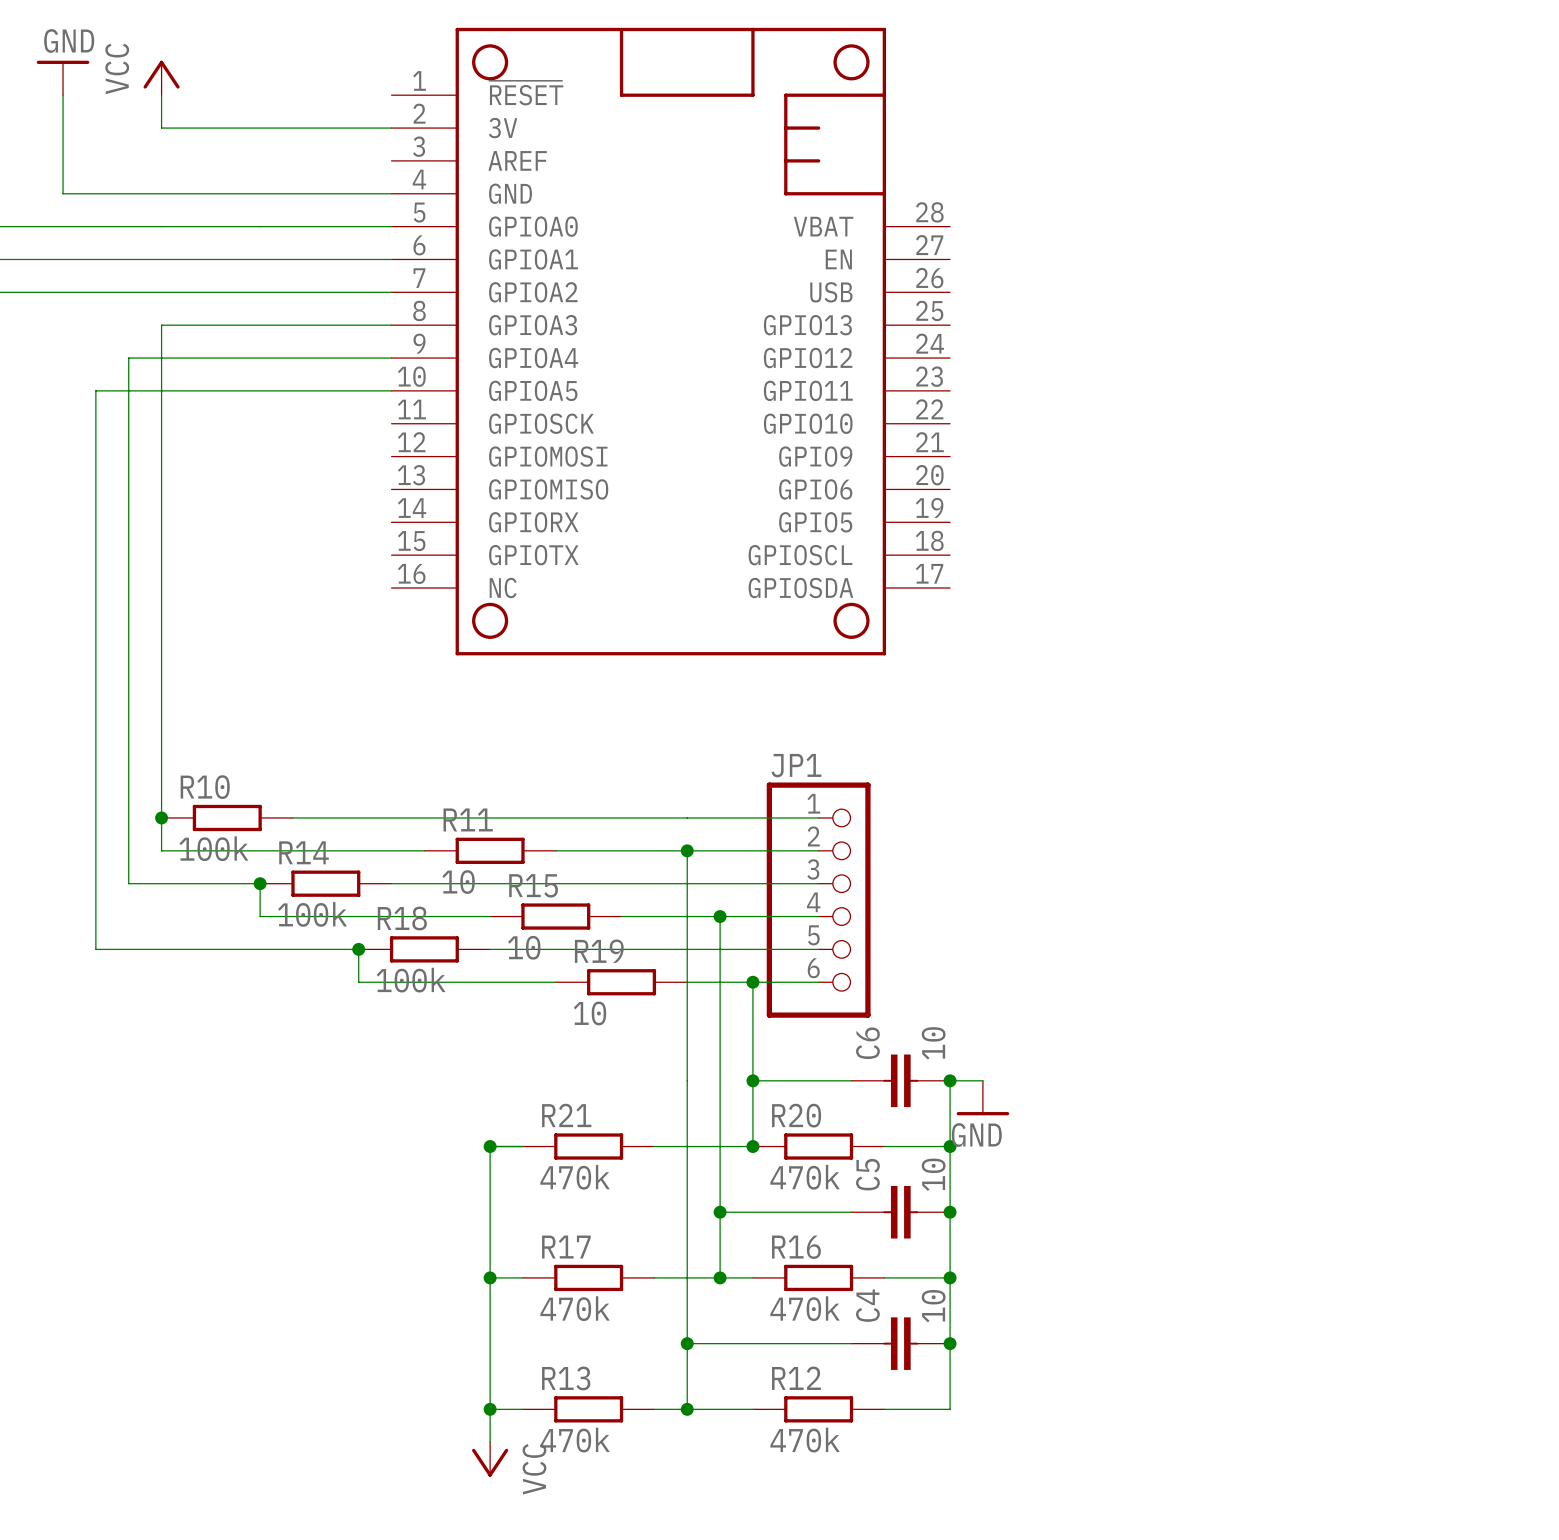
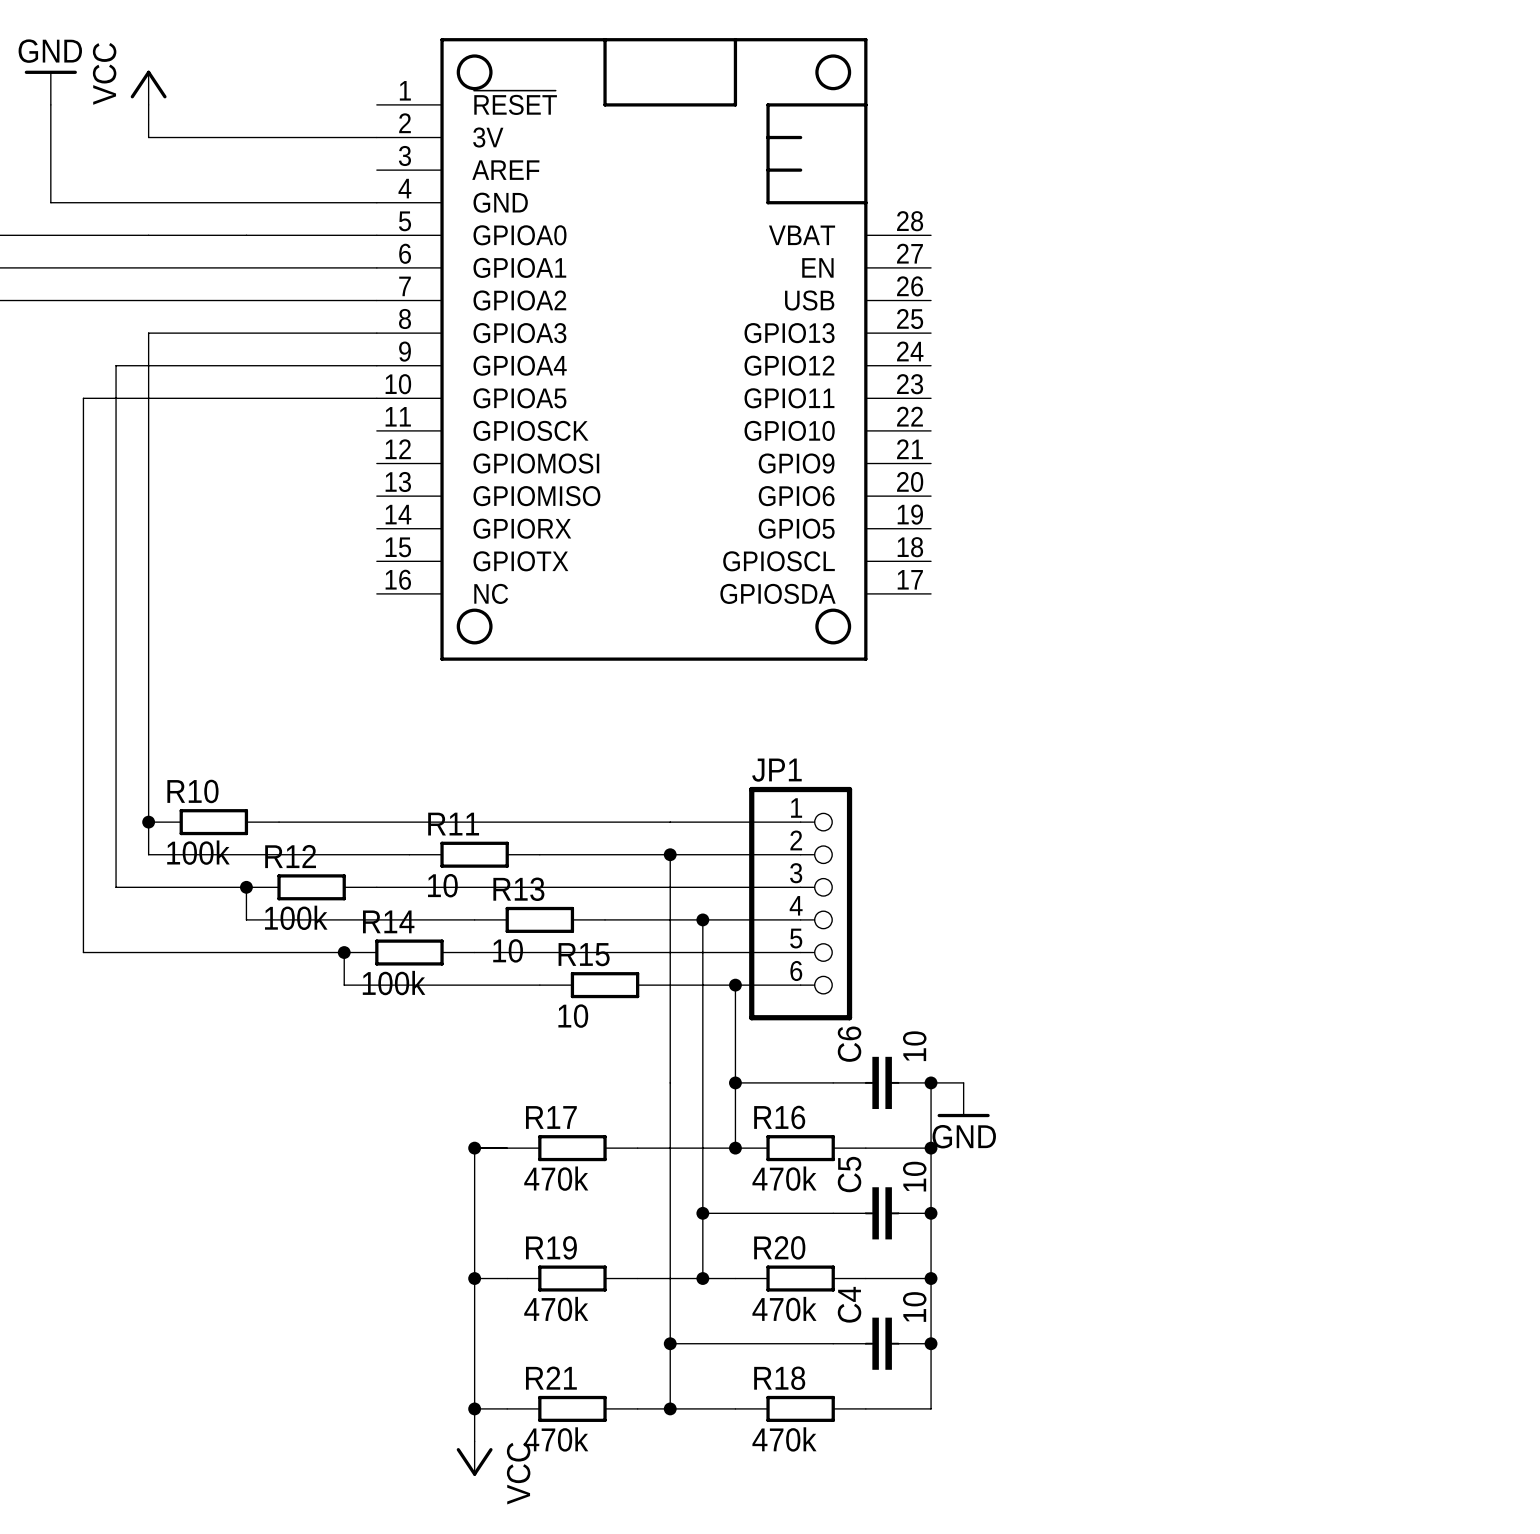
R14 name: R14 (304, 852) -> R12 (290, 856)
R15 name: R15 (533, 885) -> R13 (518, 889)
R18 name: R18 (402, 918) -> R14 (388, 921)
R19 name: R19 (599, 951) -> R15 (584, 954)
R21 name: R21 (566, 1115) -> R17 (551, 1117)
R20 name: R20 (796, 1115) -> R16 (779, 1117)
R17 name: R17 (566, 1247) -> R19 (551, 1247)
R16 name: R16 (796, 1247) -> R20 (779, 1247)
R13 name: R13 (566, 1378) -> R21 (551, 1378)
R12 name: R12 (796, 1378) -> R18 (779, 1378)

